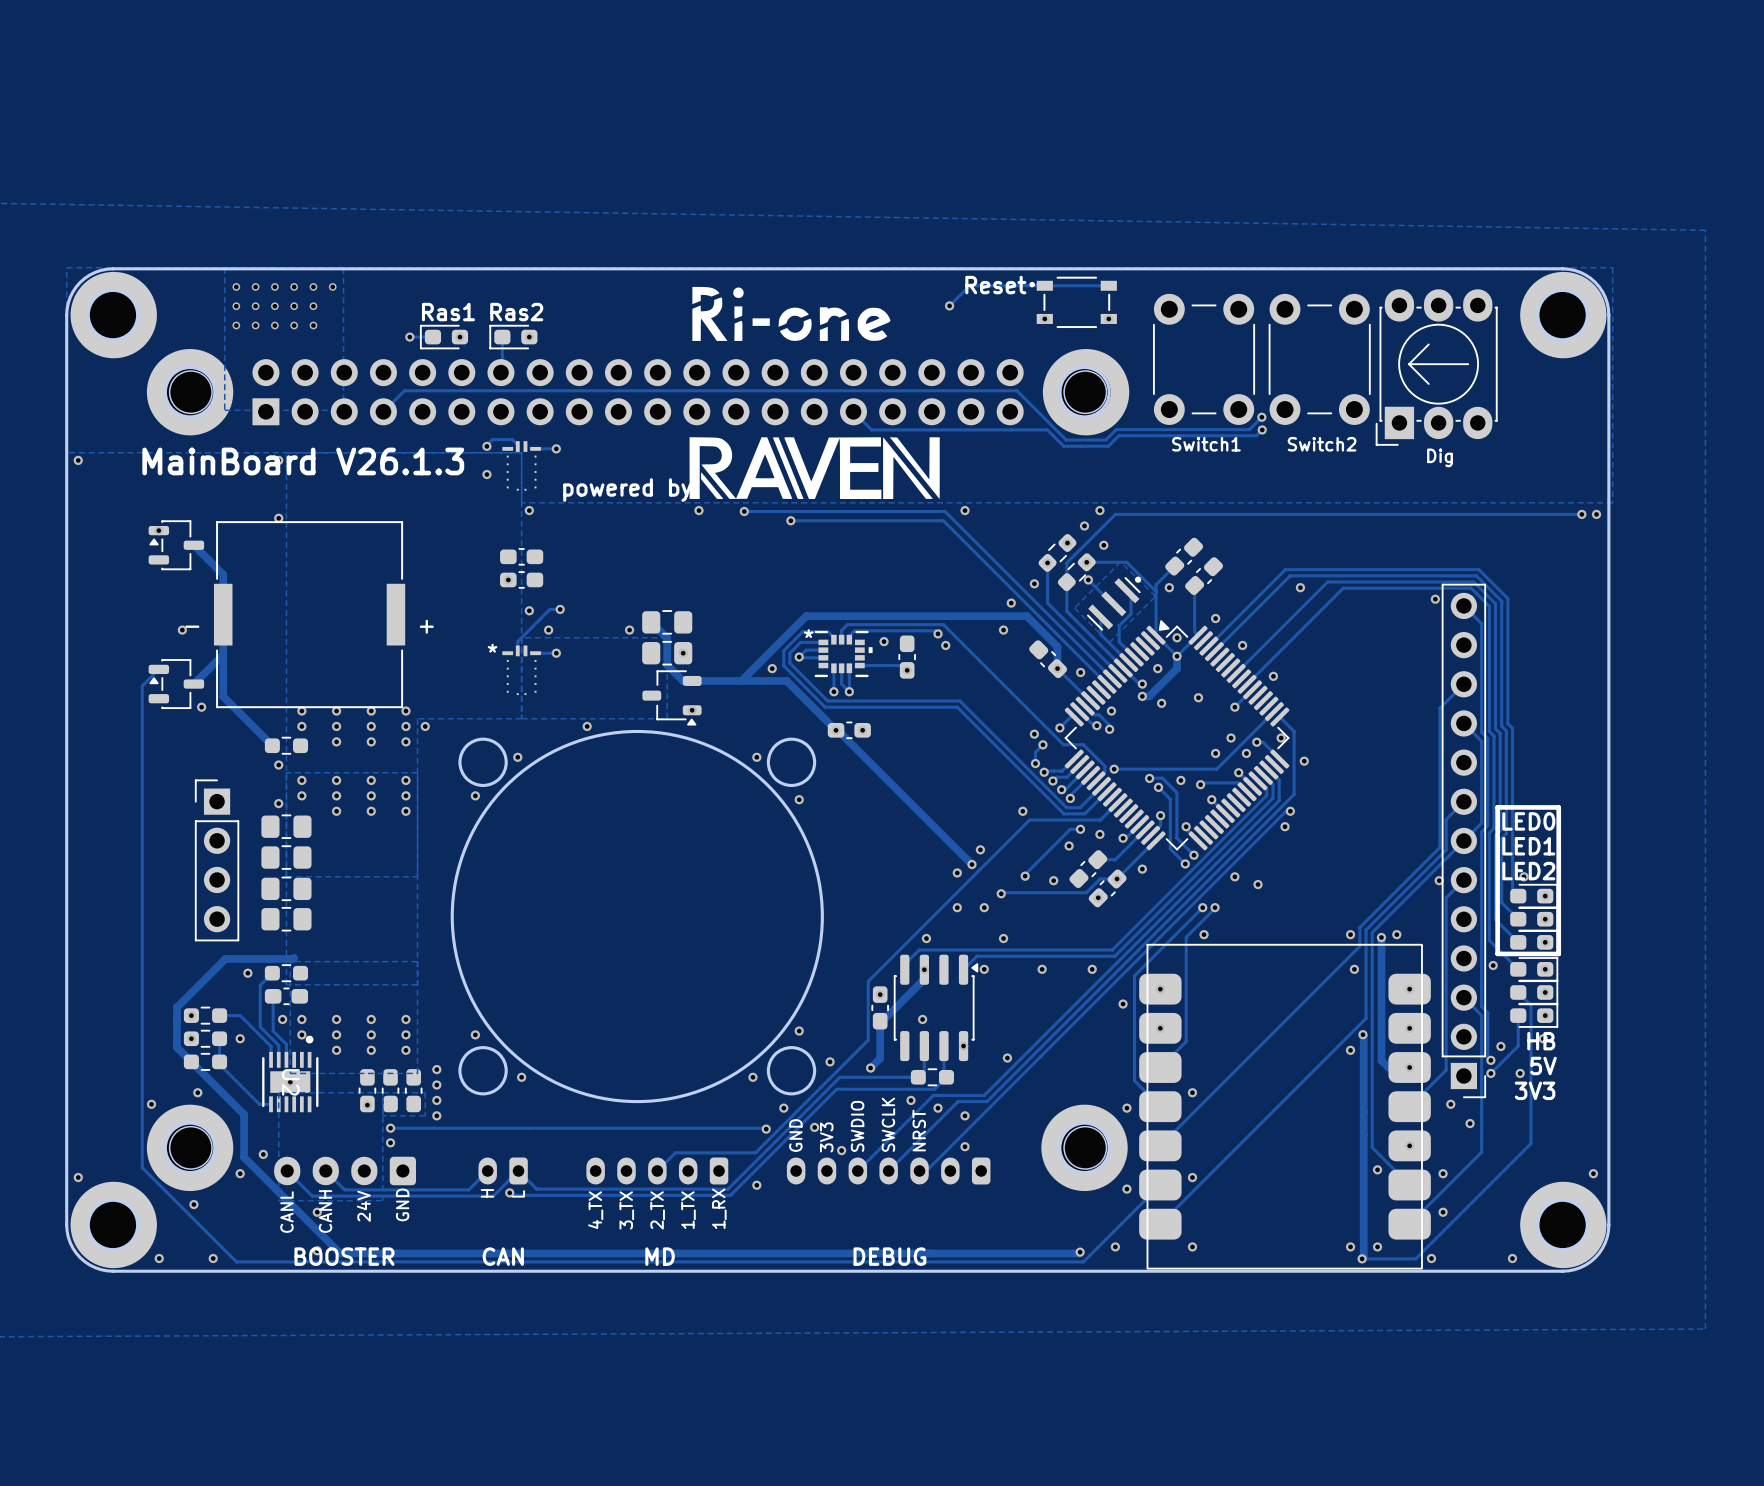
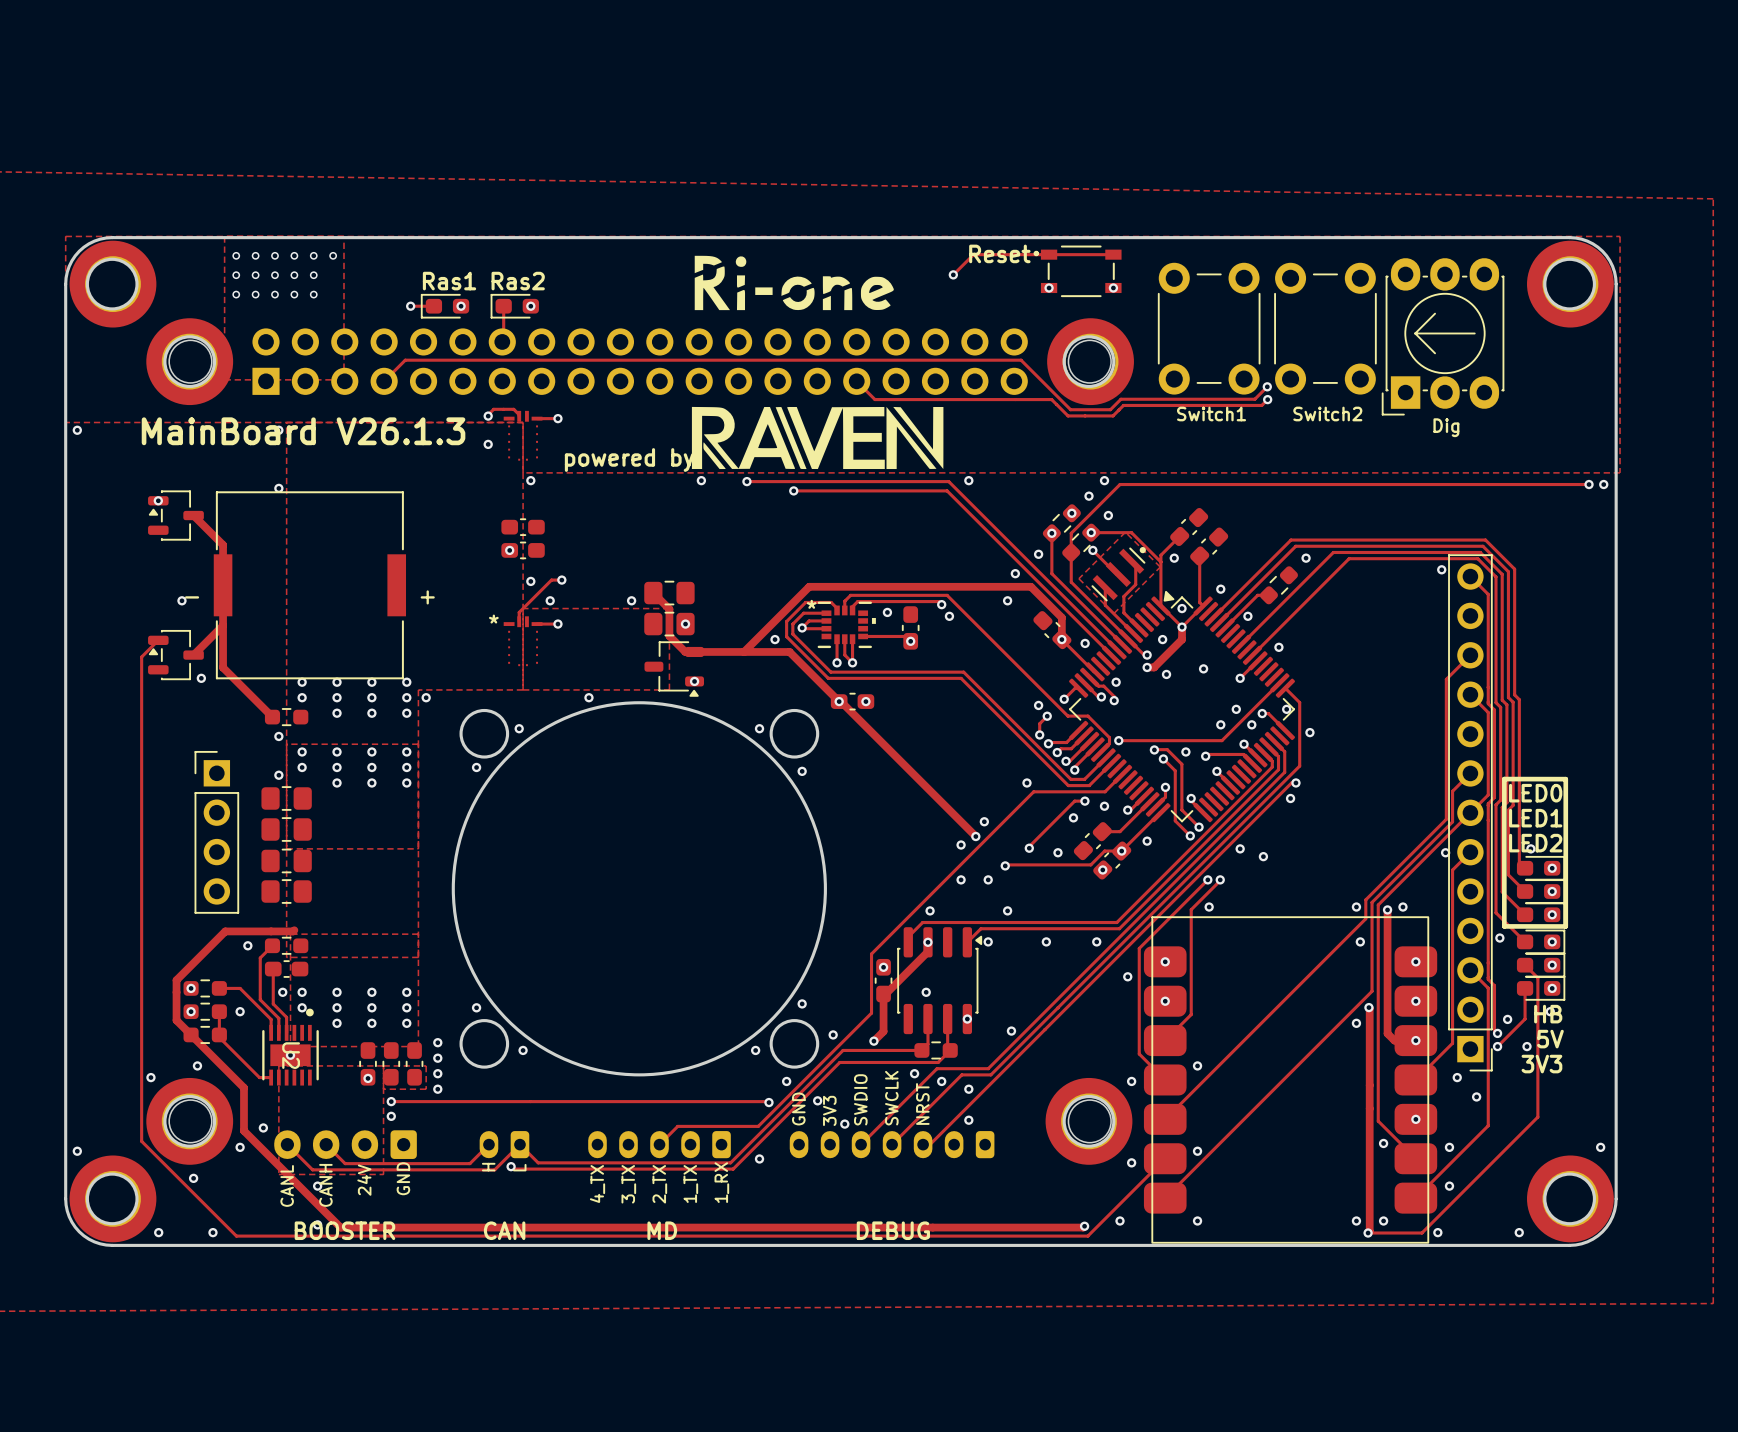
part: none -> (1278, 585)
track: none -> (1268, 595) (1257, 595) (1225, 627)

